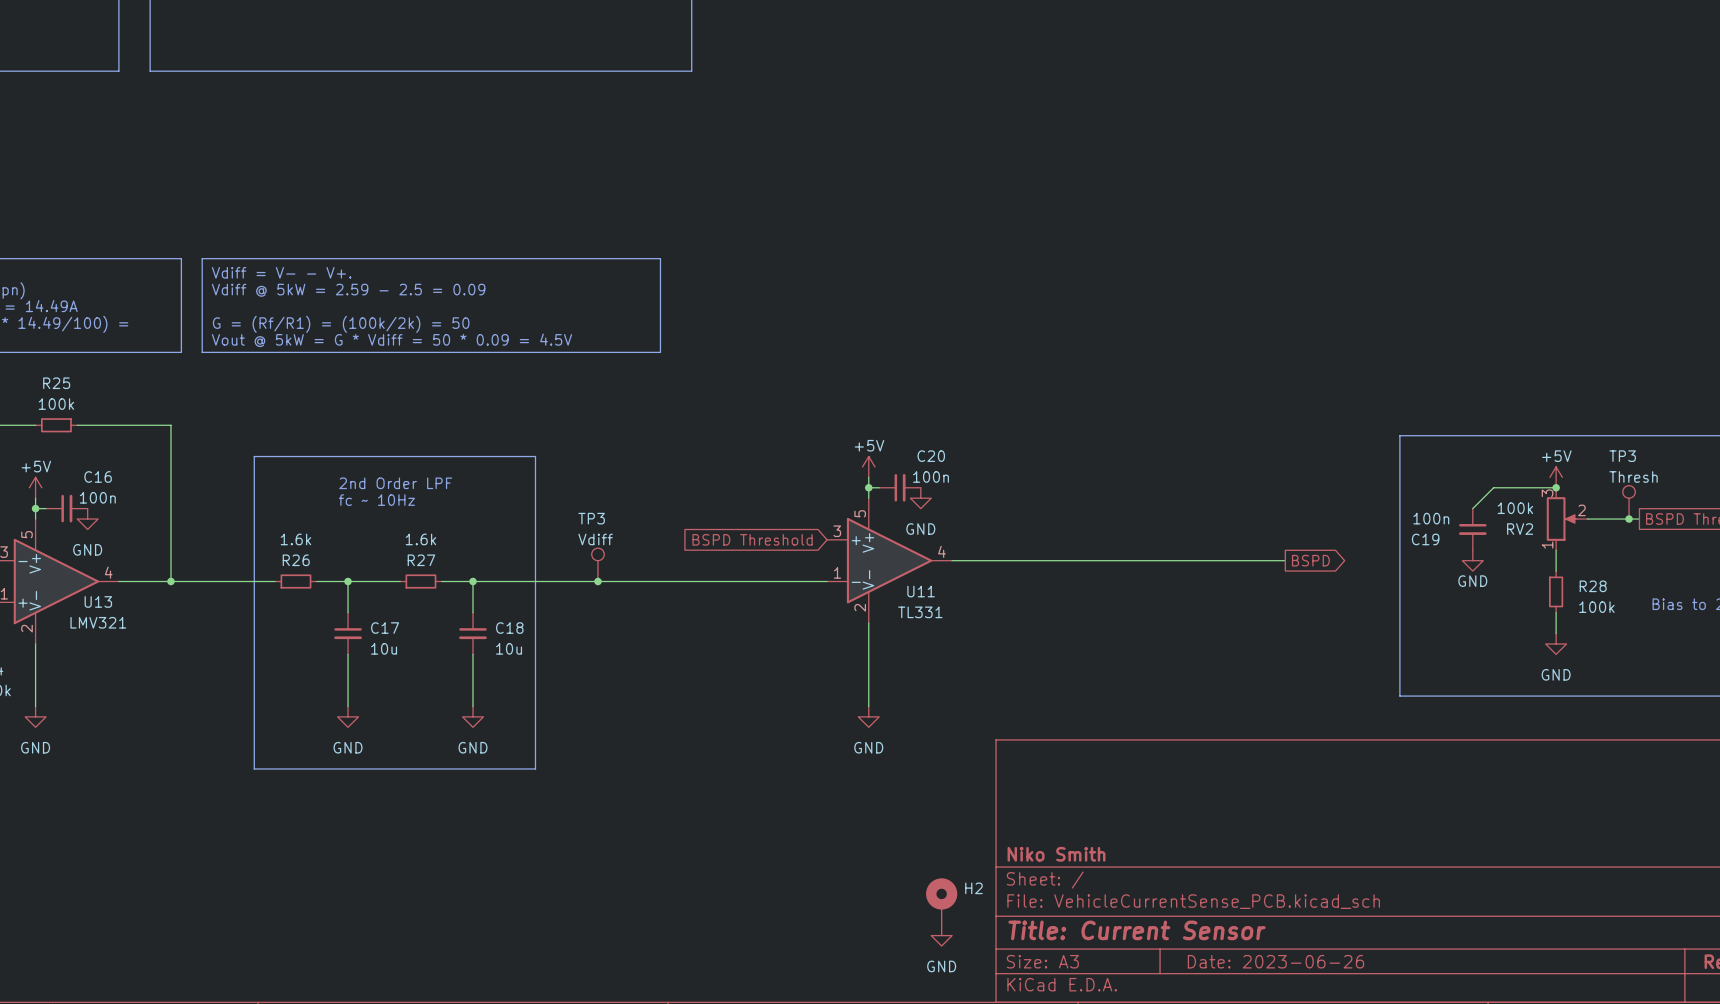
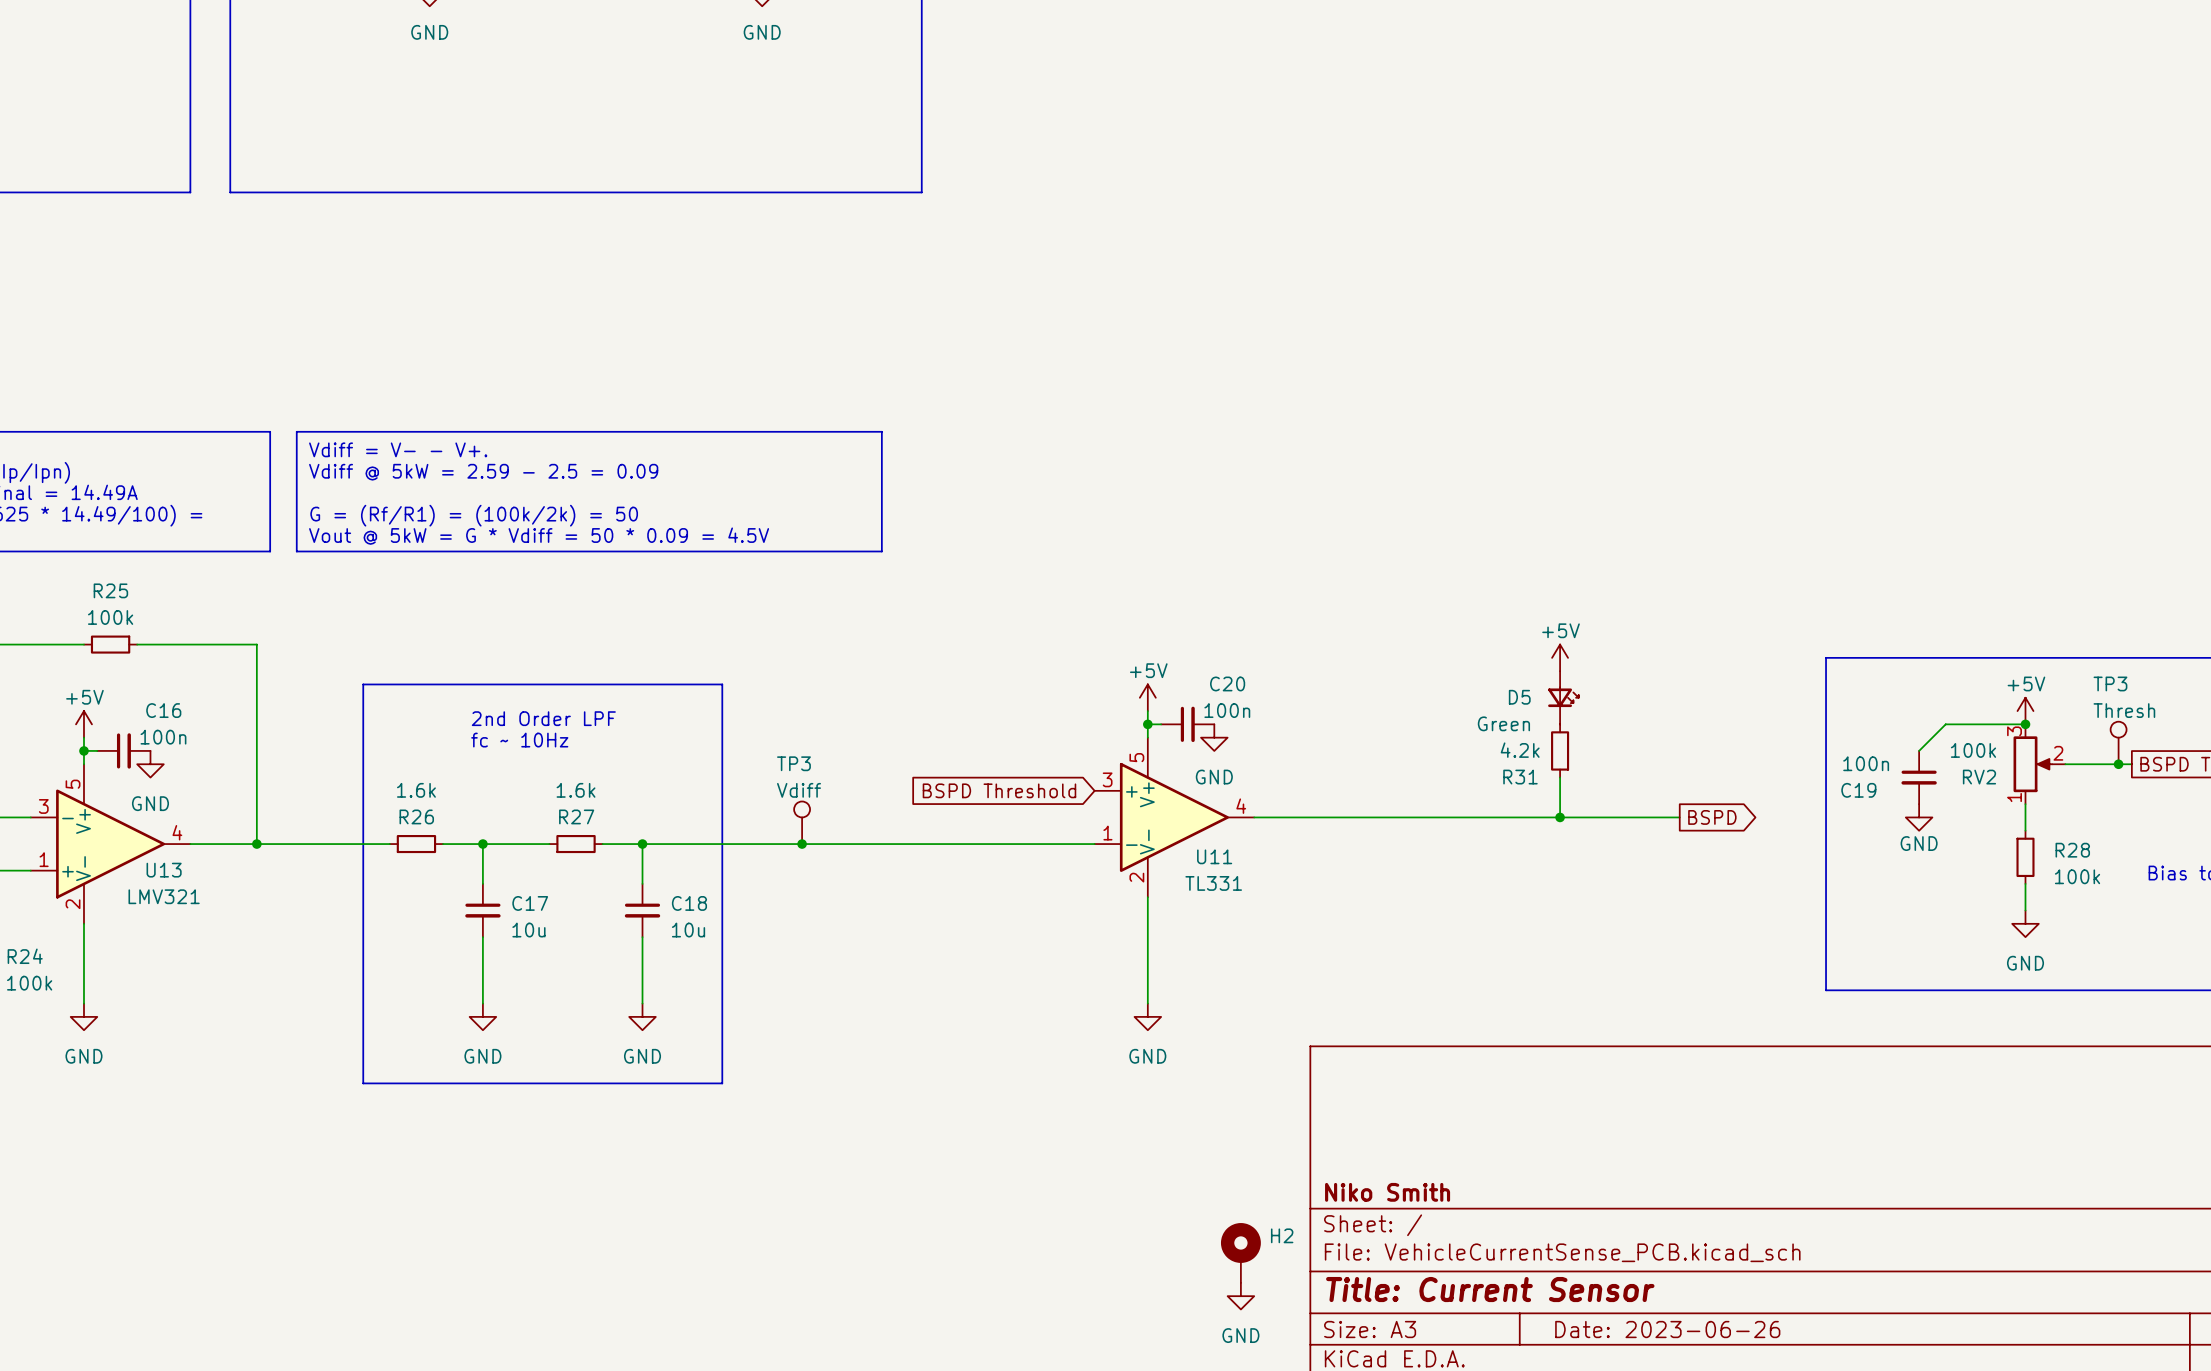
power symbol: none -> +5V (1560, 657)
D5: none -> Green (1563, 697)
R31: none -> 4.2k (1560, 750)
wire: none -> (1560, 777) (1560, 817)
junction: none -> (1560, 817)

